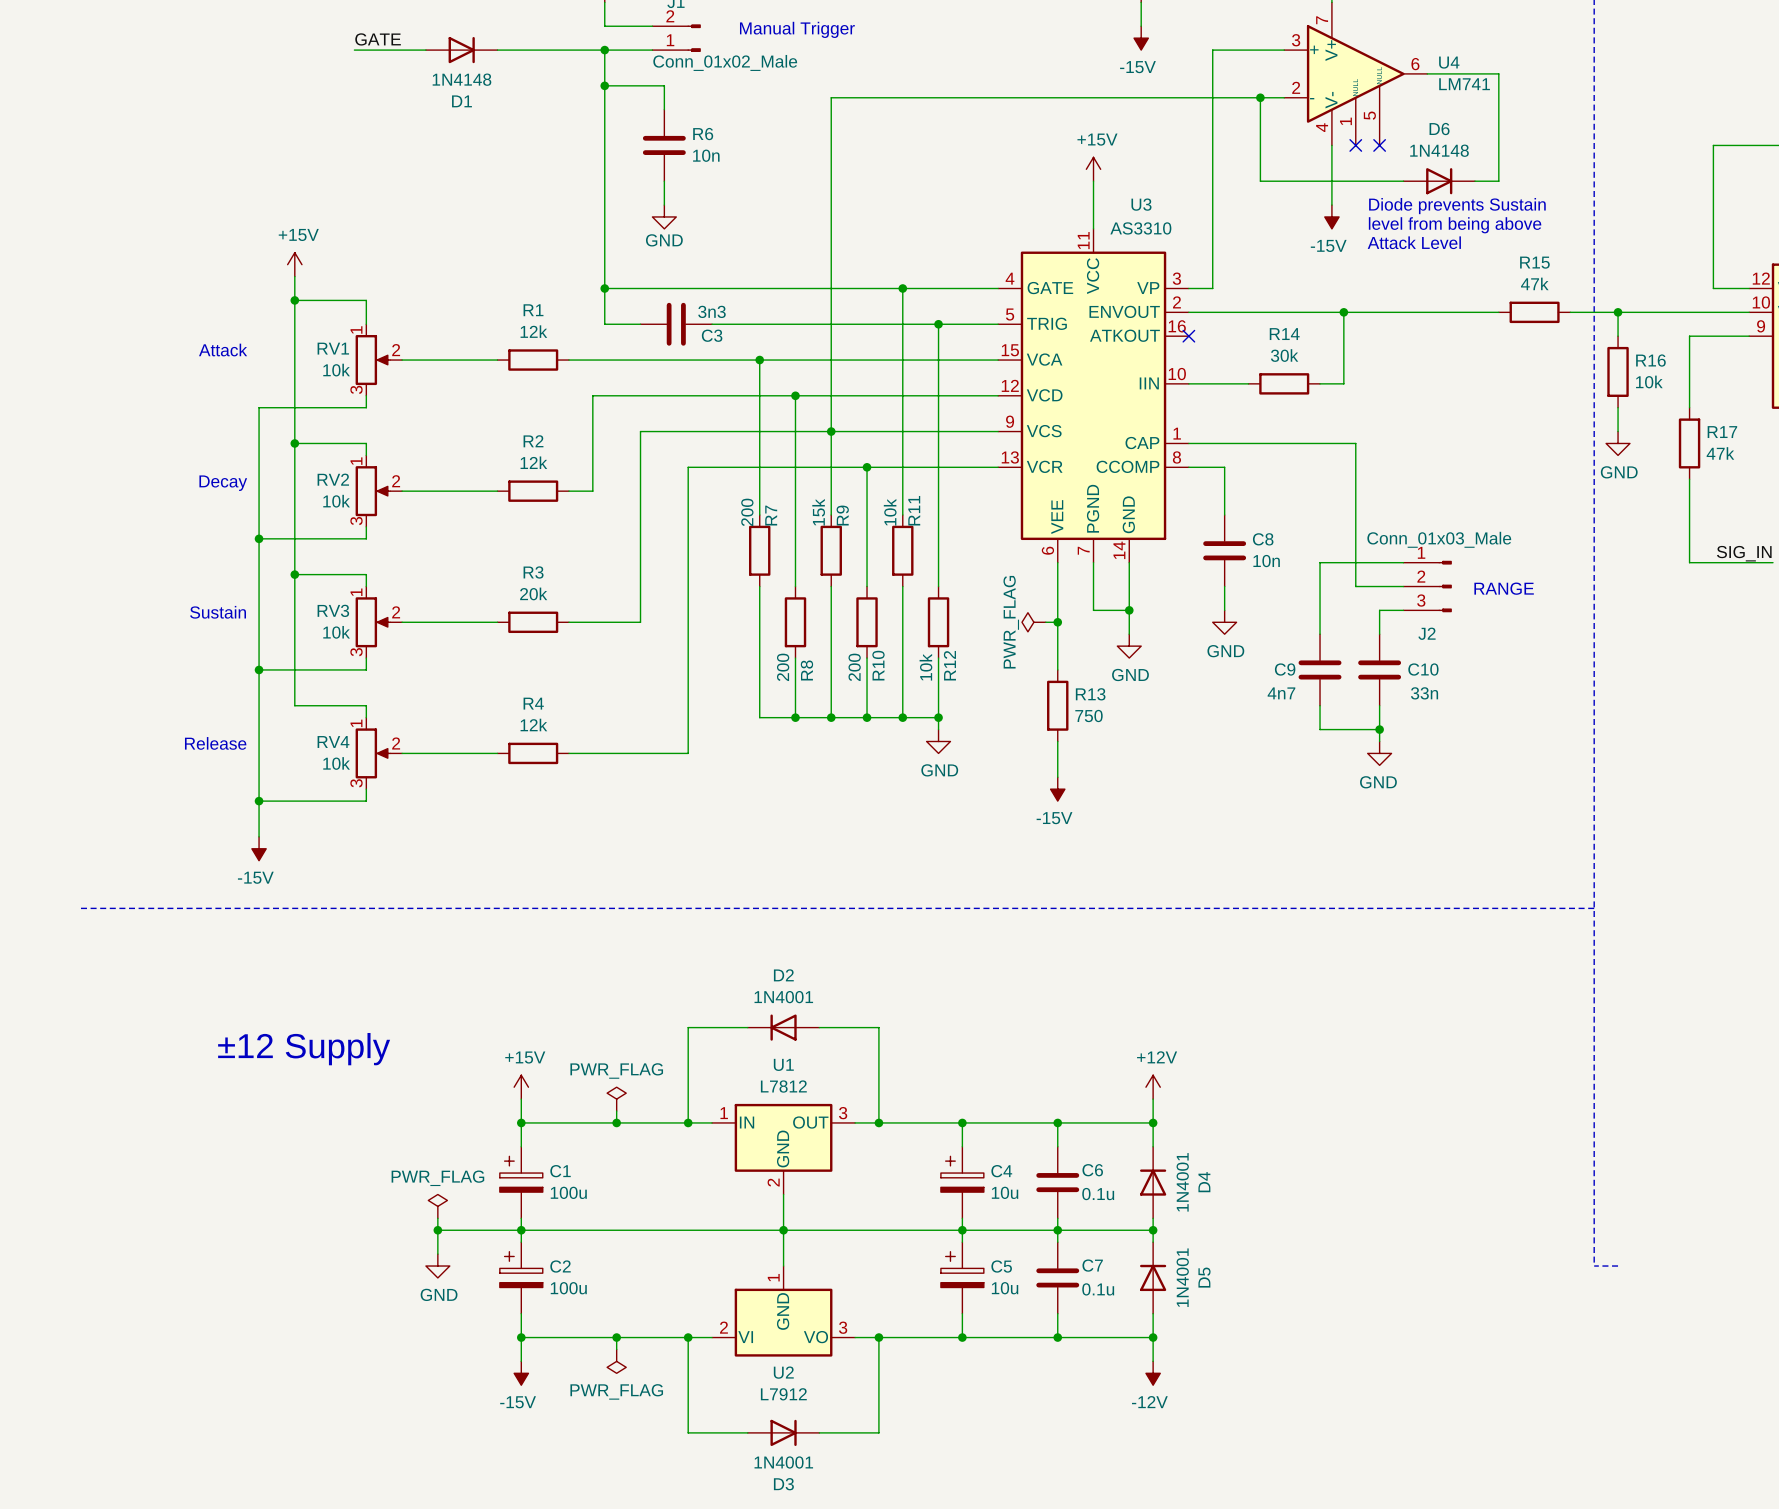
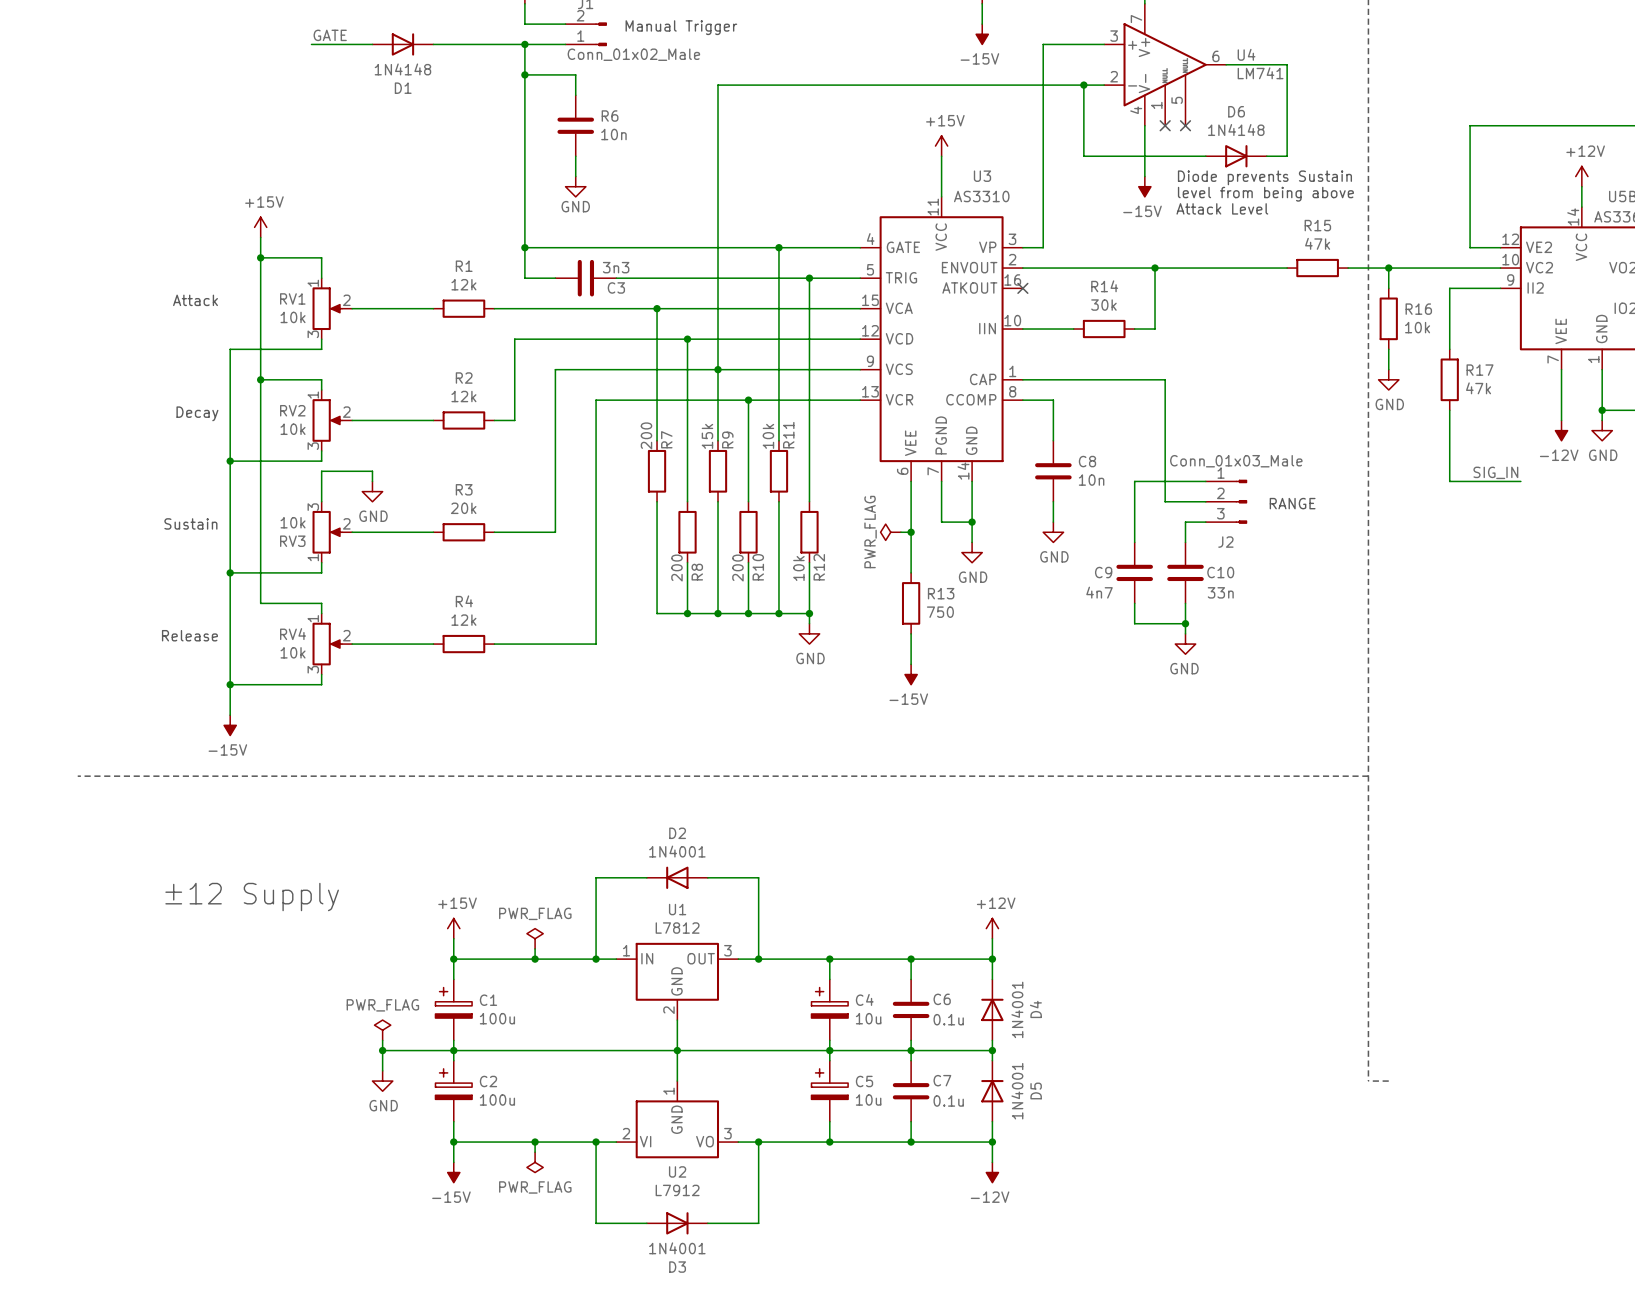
wire: (294, 574) (366, 574) -> (372, 481) (372, 471) (321, 471) (321, 491)
junction: (294, 574) -> none
power symbol: none -> GND (372, 491)
RV3 flip: as is (372, 622) -> up-down (327, 532)

